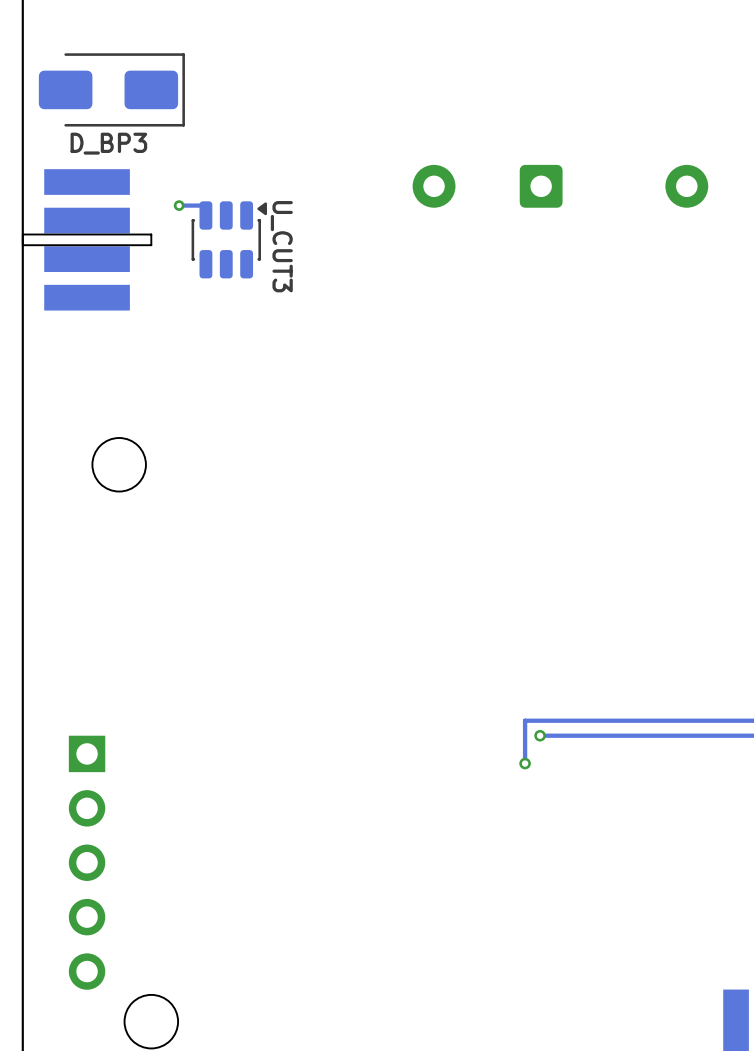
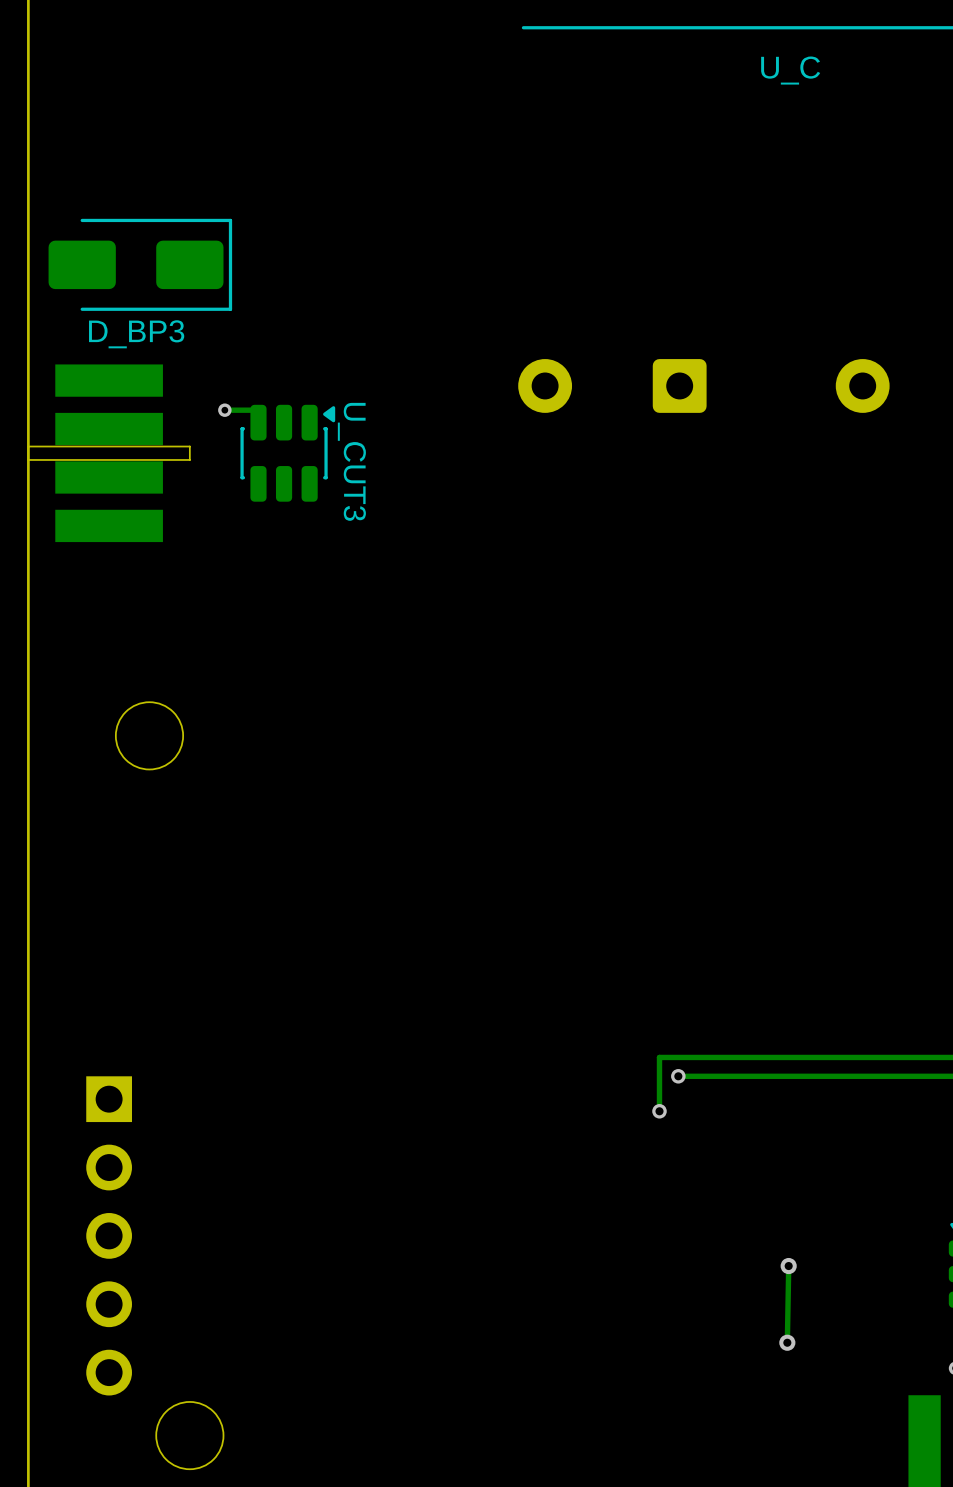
via: none -> (788, 1266)
track: none -> (788, 1268) (787, 1342)
via: none -> (787, 1342)

